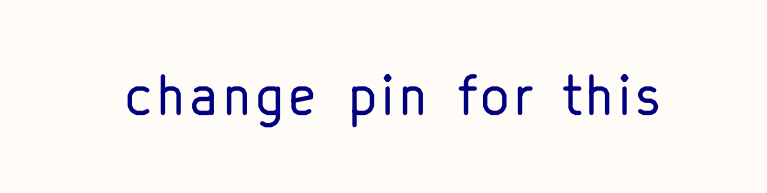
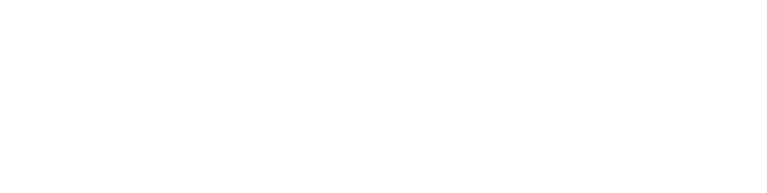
text: change pin for this (392, 100) -> none

